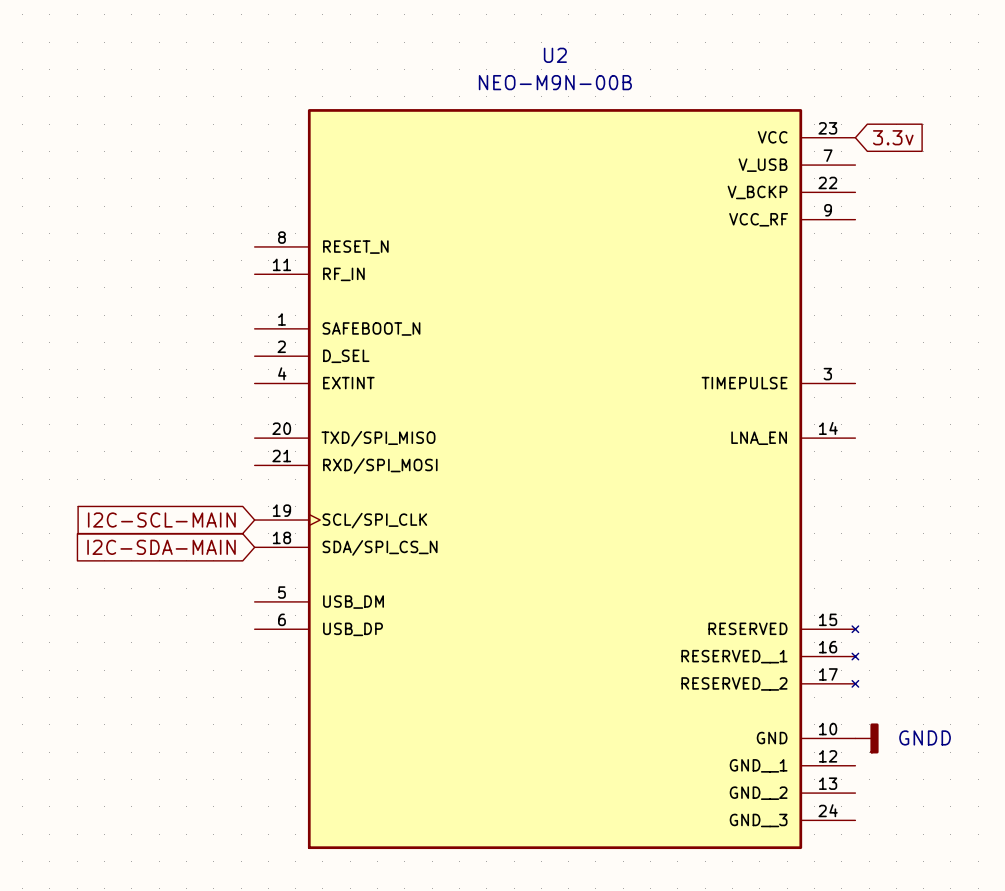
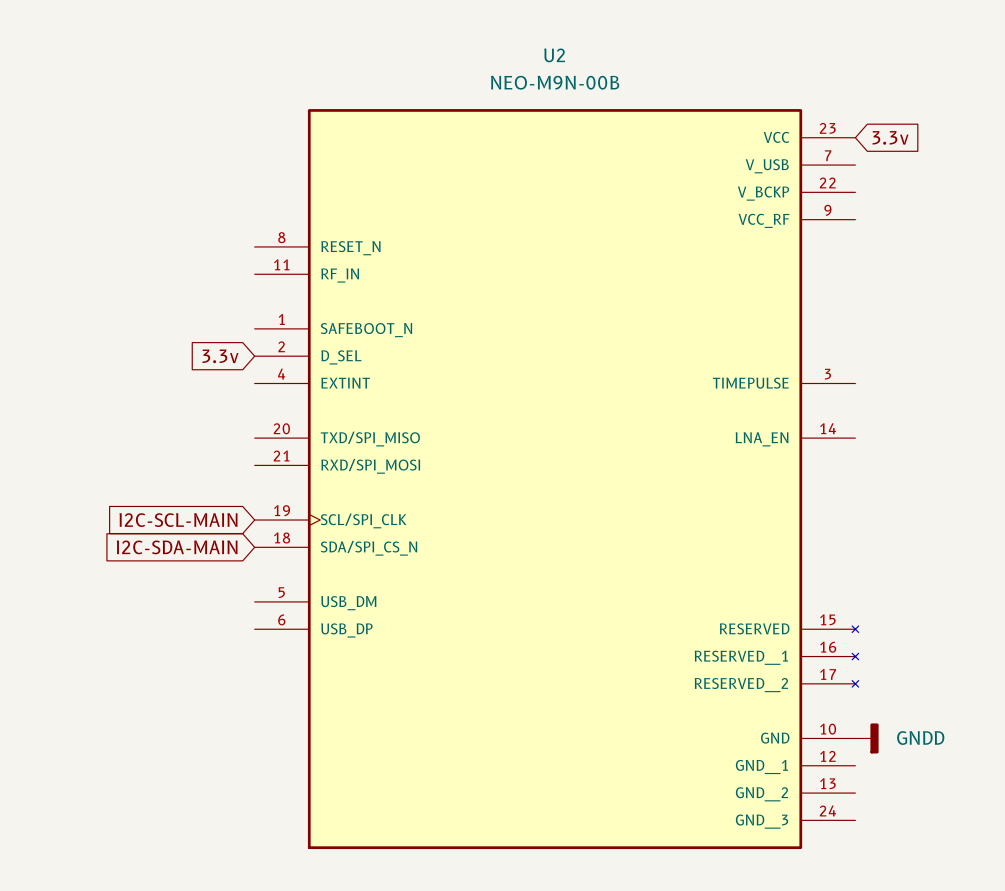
global label: none -> 3.3v (220, 356)

